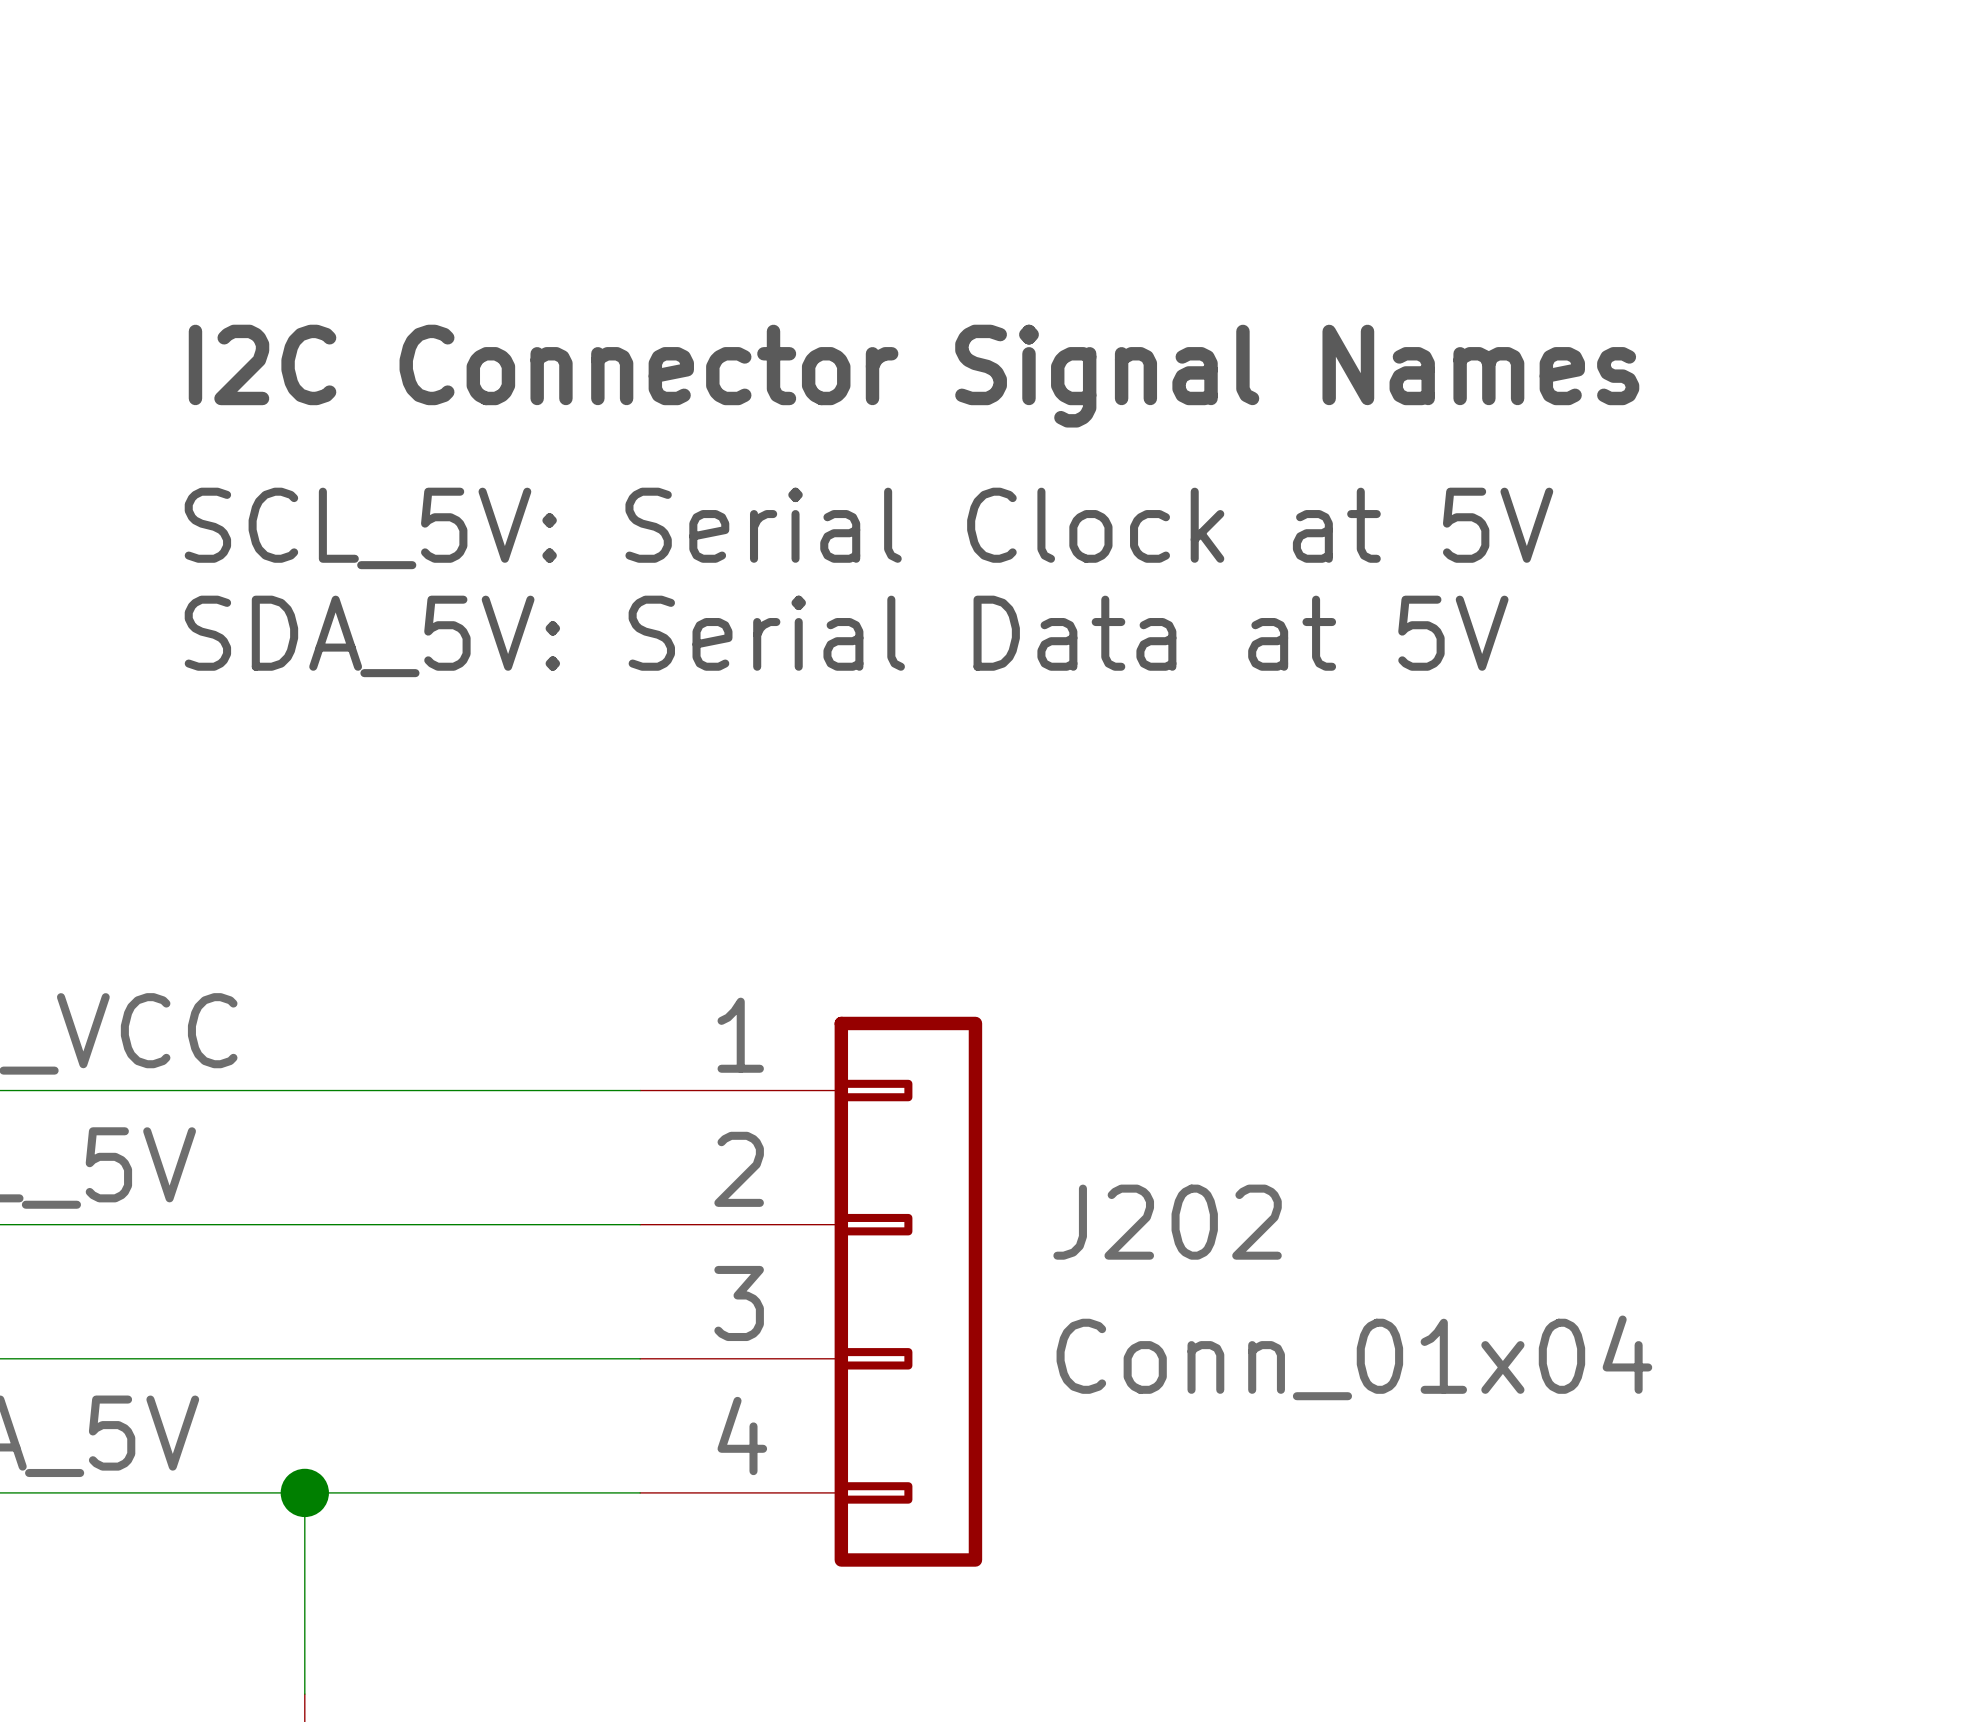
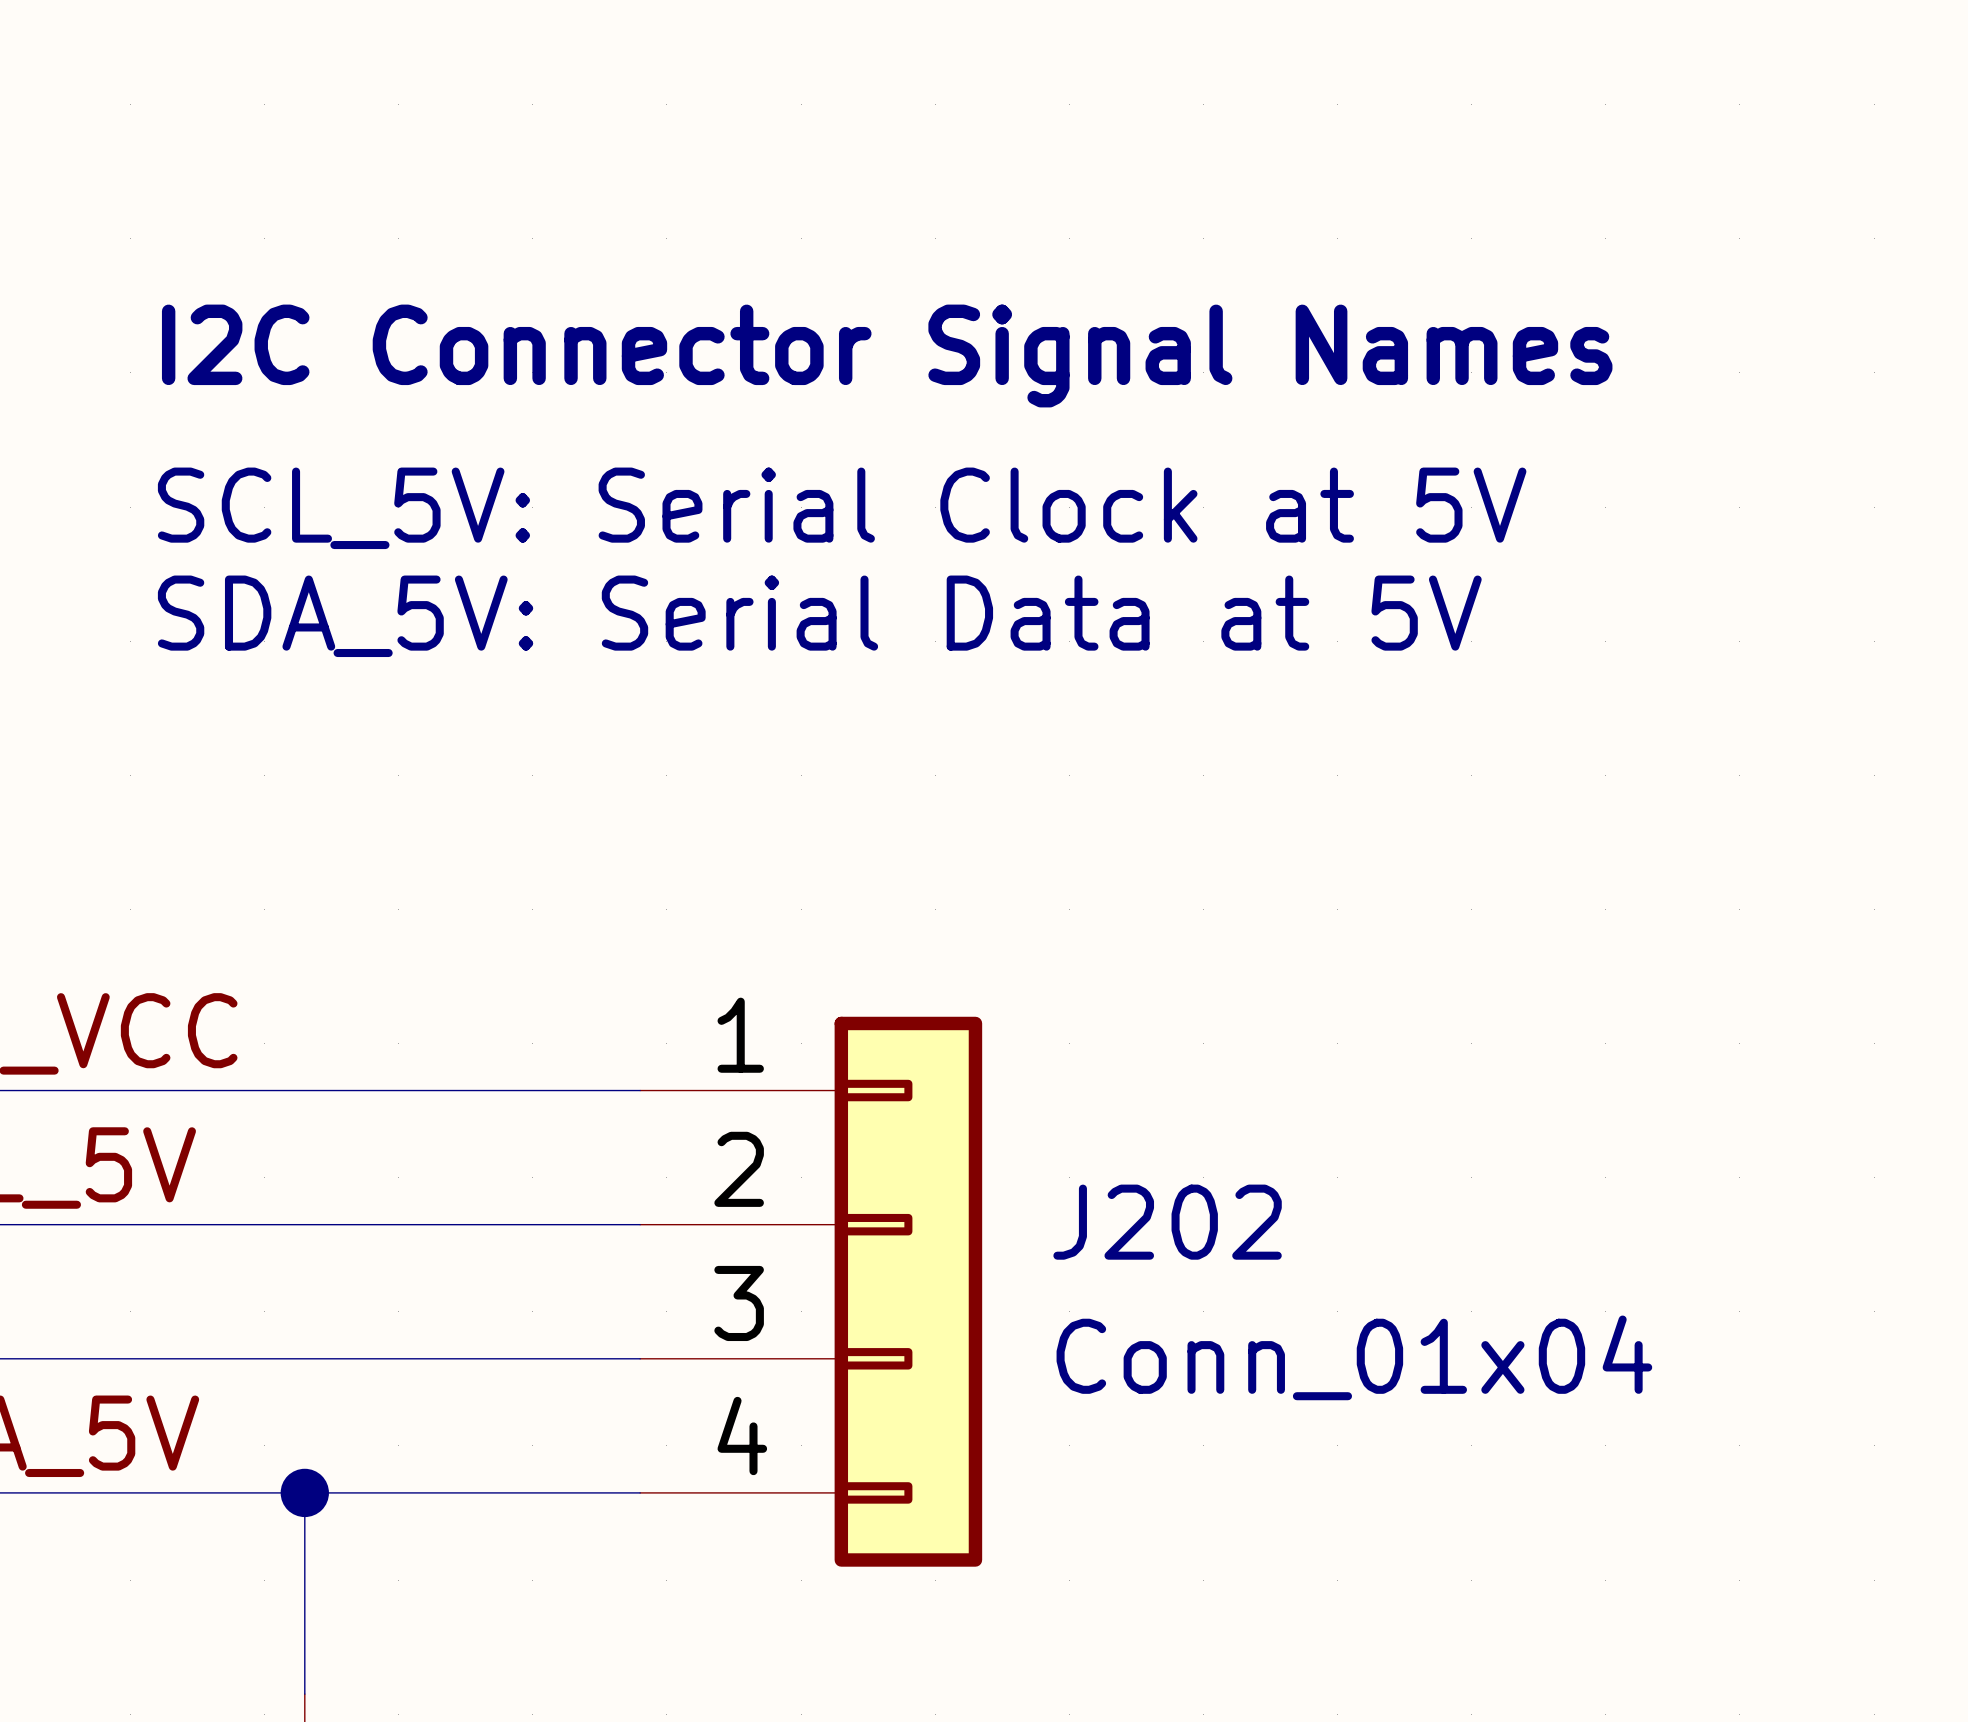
text position: I2C Connector Signal Names (914, 376) -> I2C Connector Signal Names (887, 356)
text position: SCL_5V: Serial Clock at 5V (868, 528) -> SCL_5V: Serial Clock at 5V (842, 508)
text position: SDA_5V: Serial Data at 5V (846, 636) -> SDA_5V: Serial Data at 5V (819, 616)

